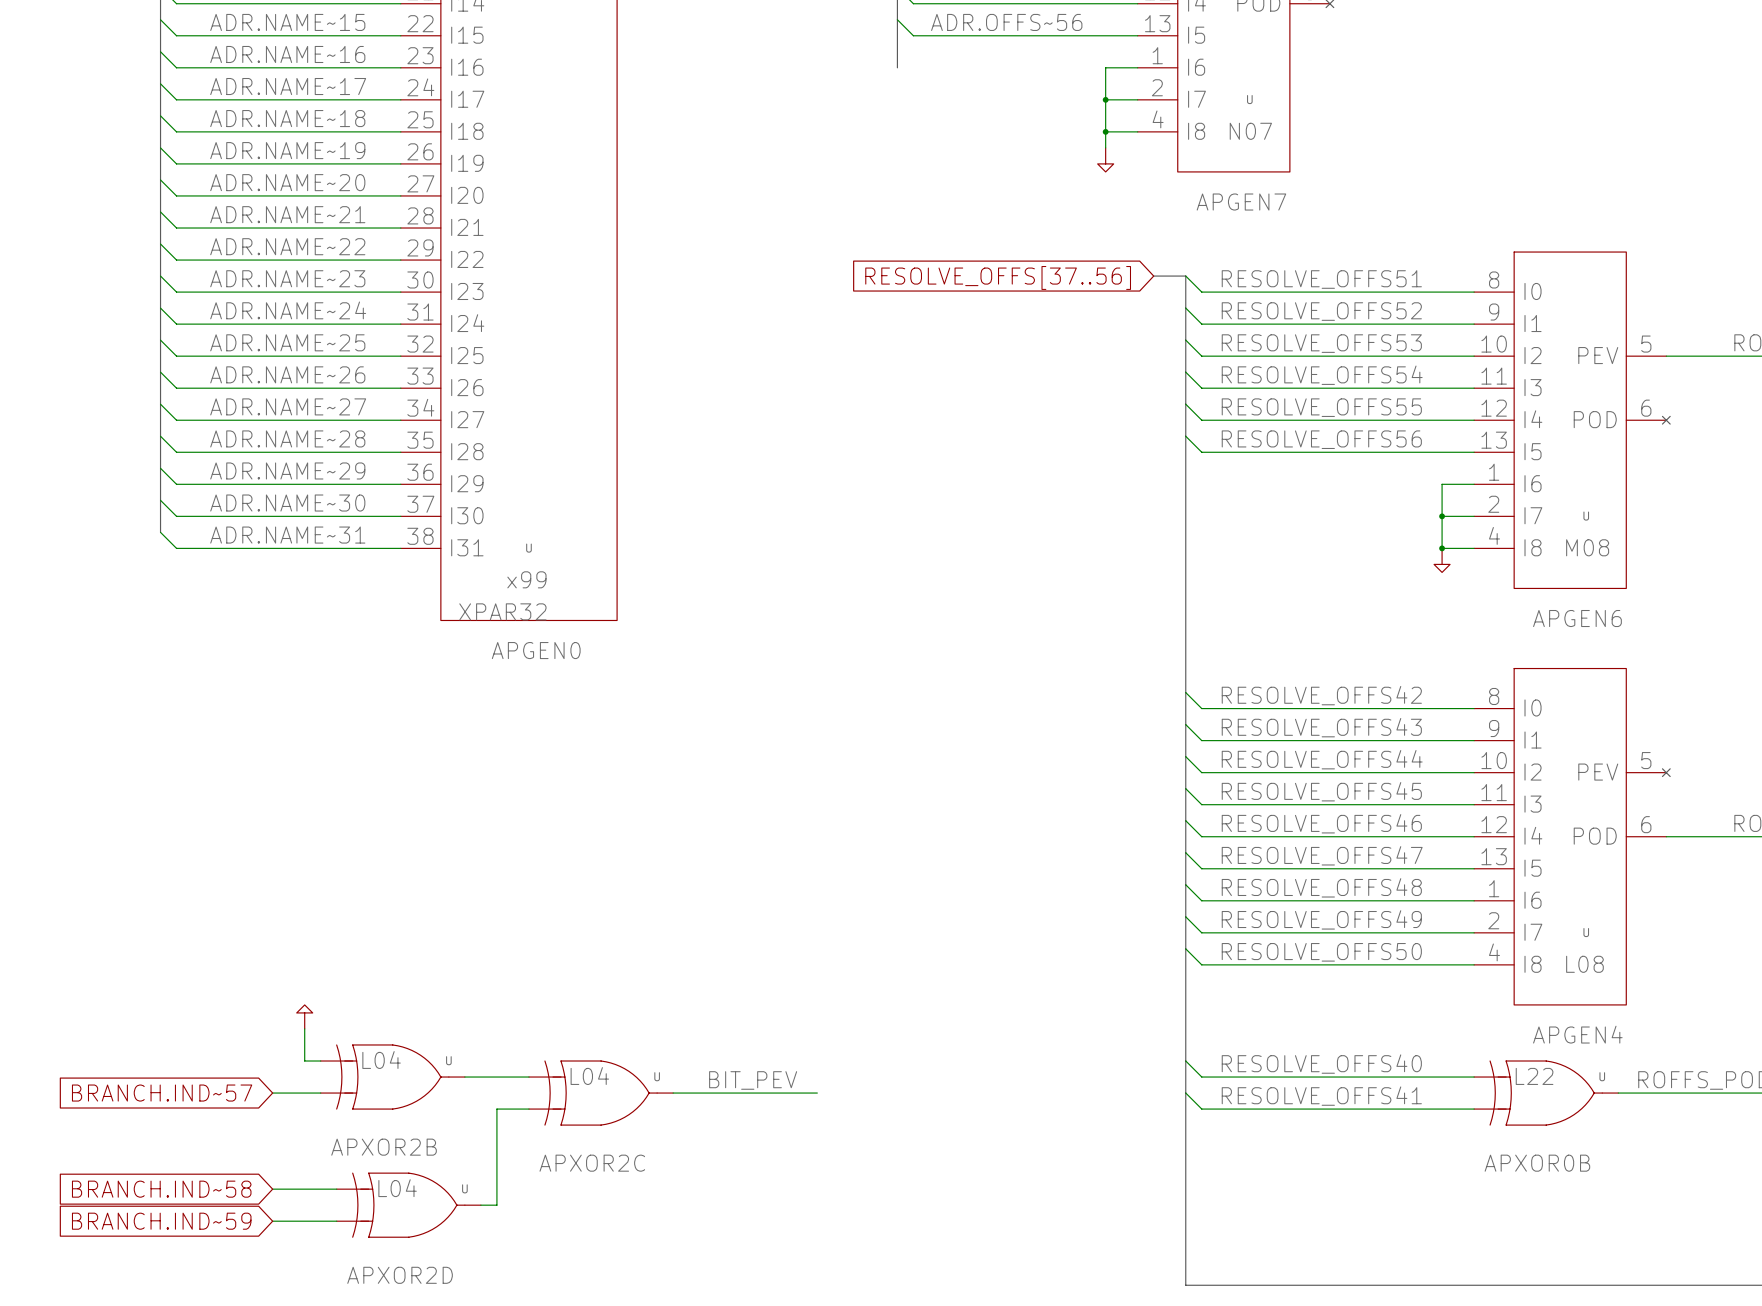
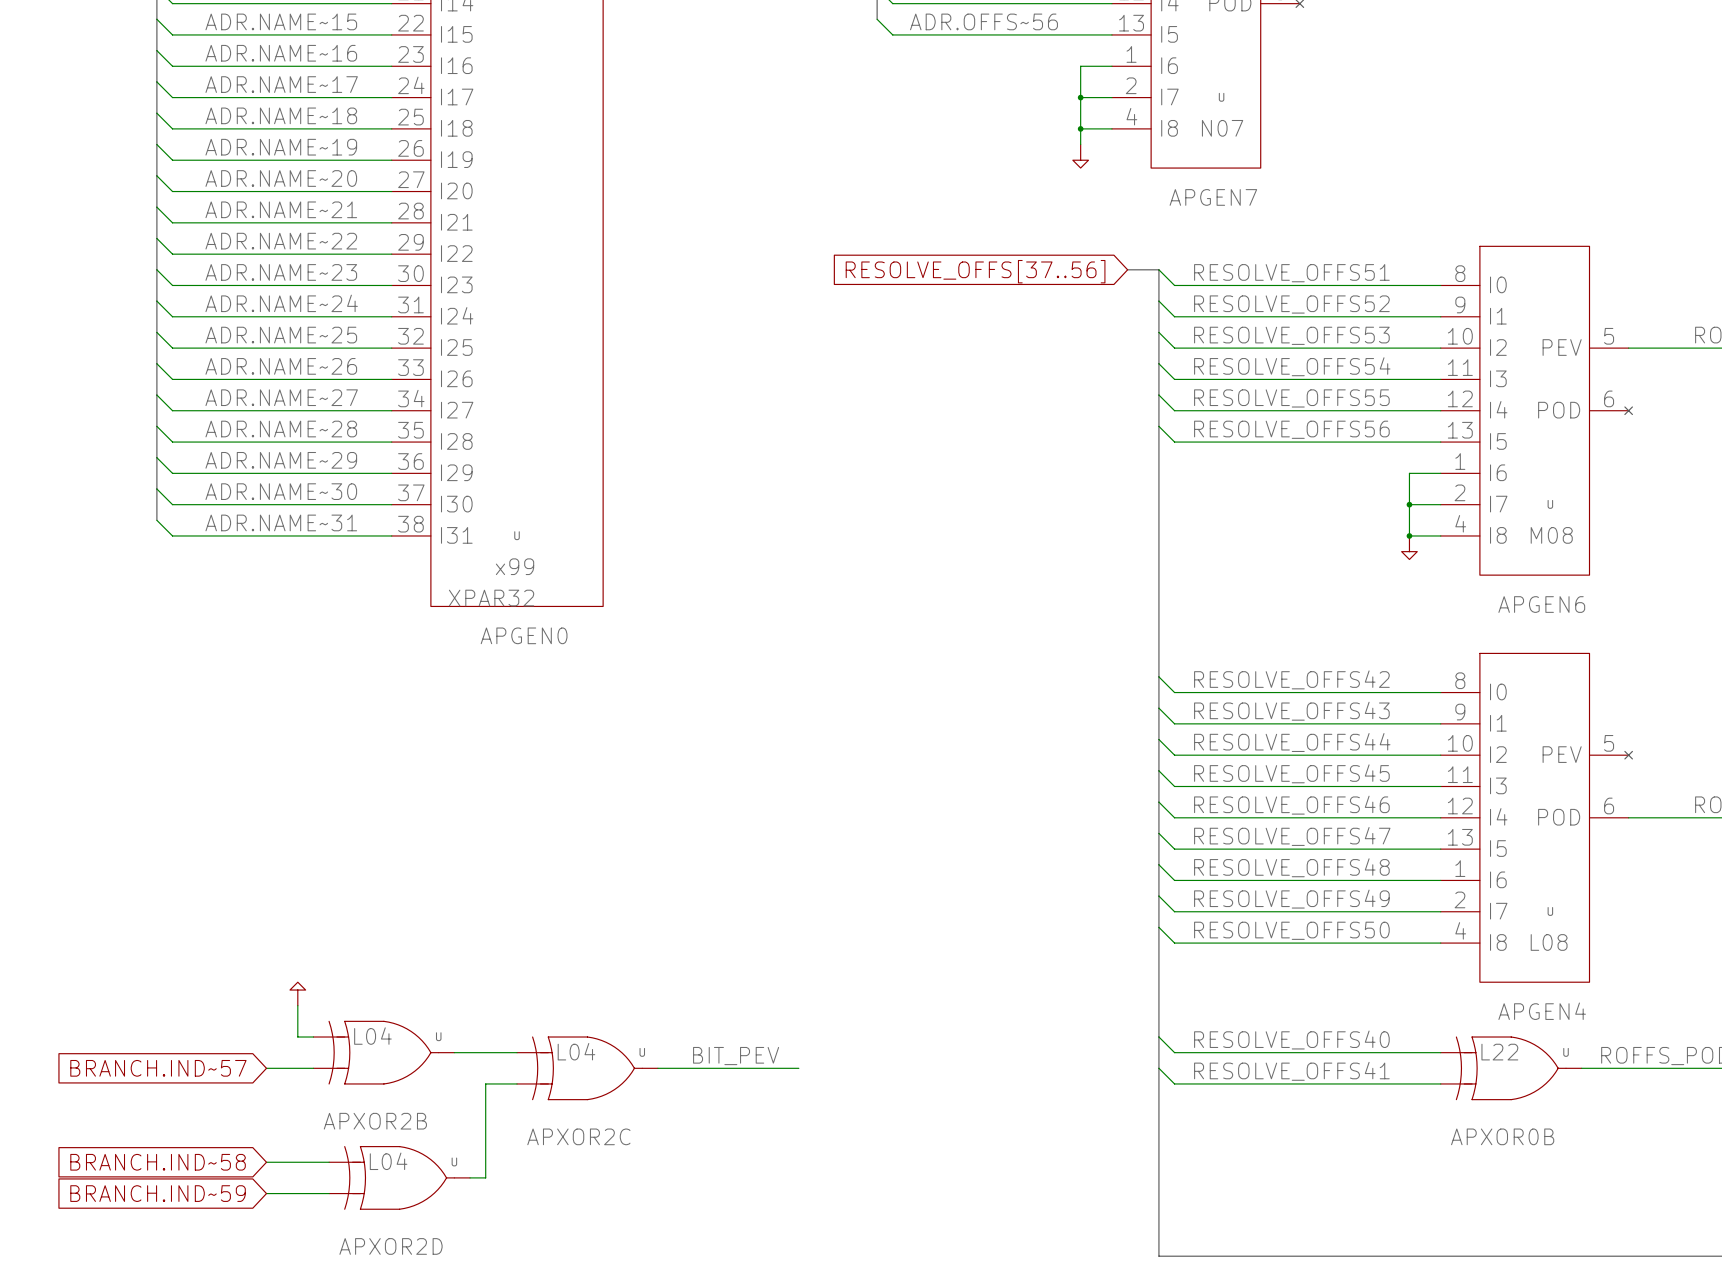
bus: (897, 19) (897, 67) -> none

